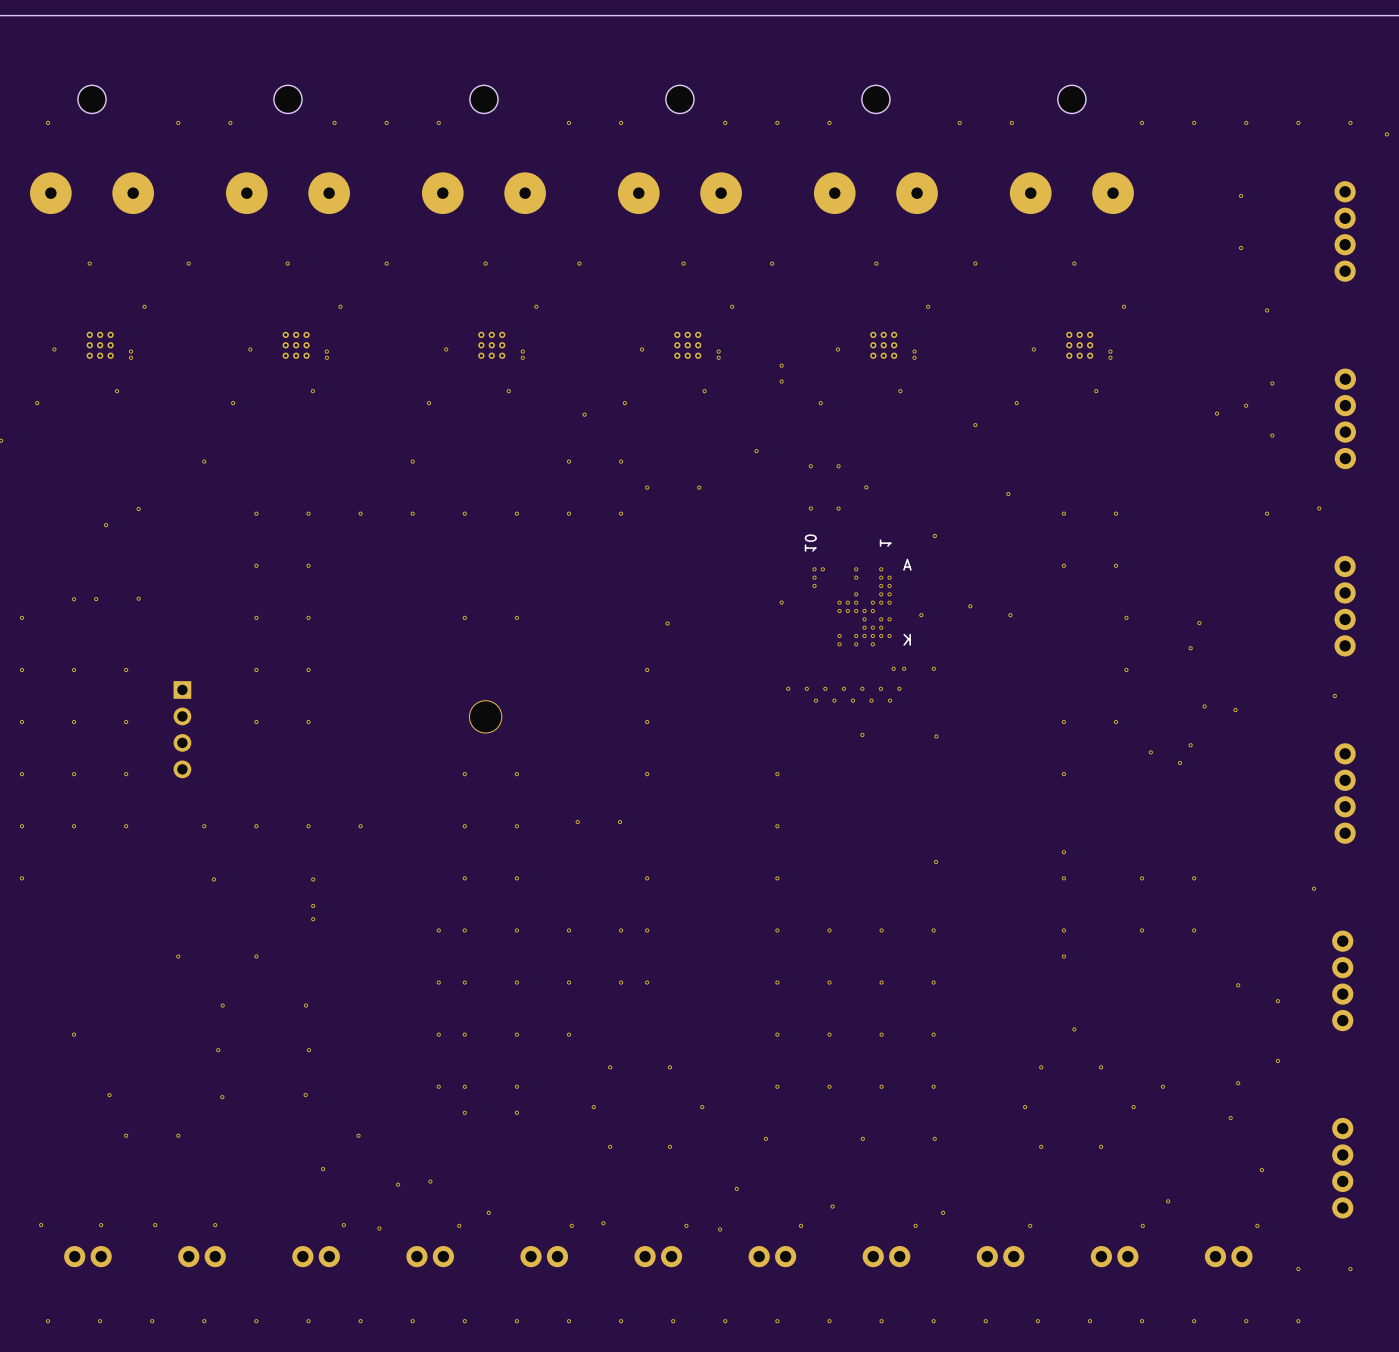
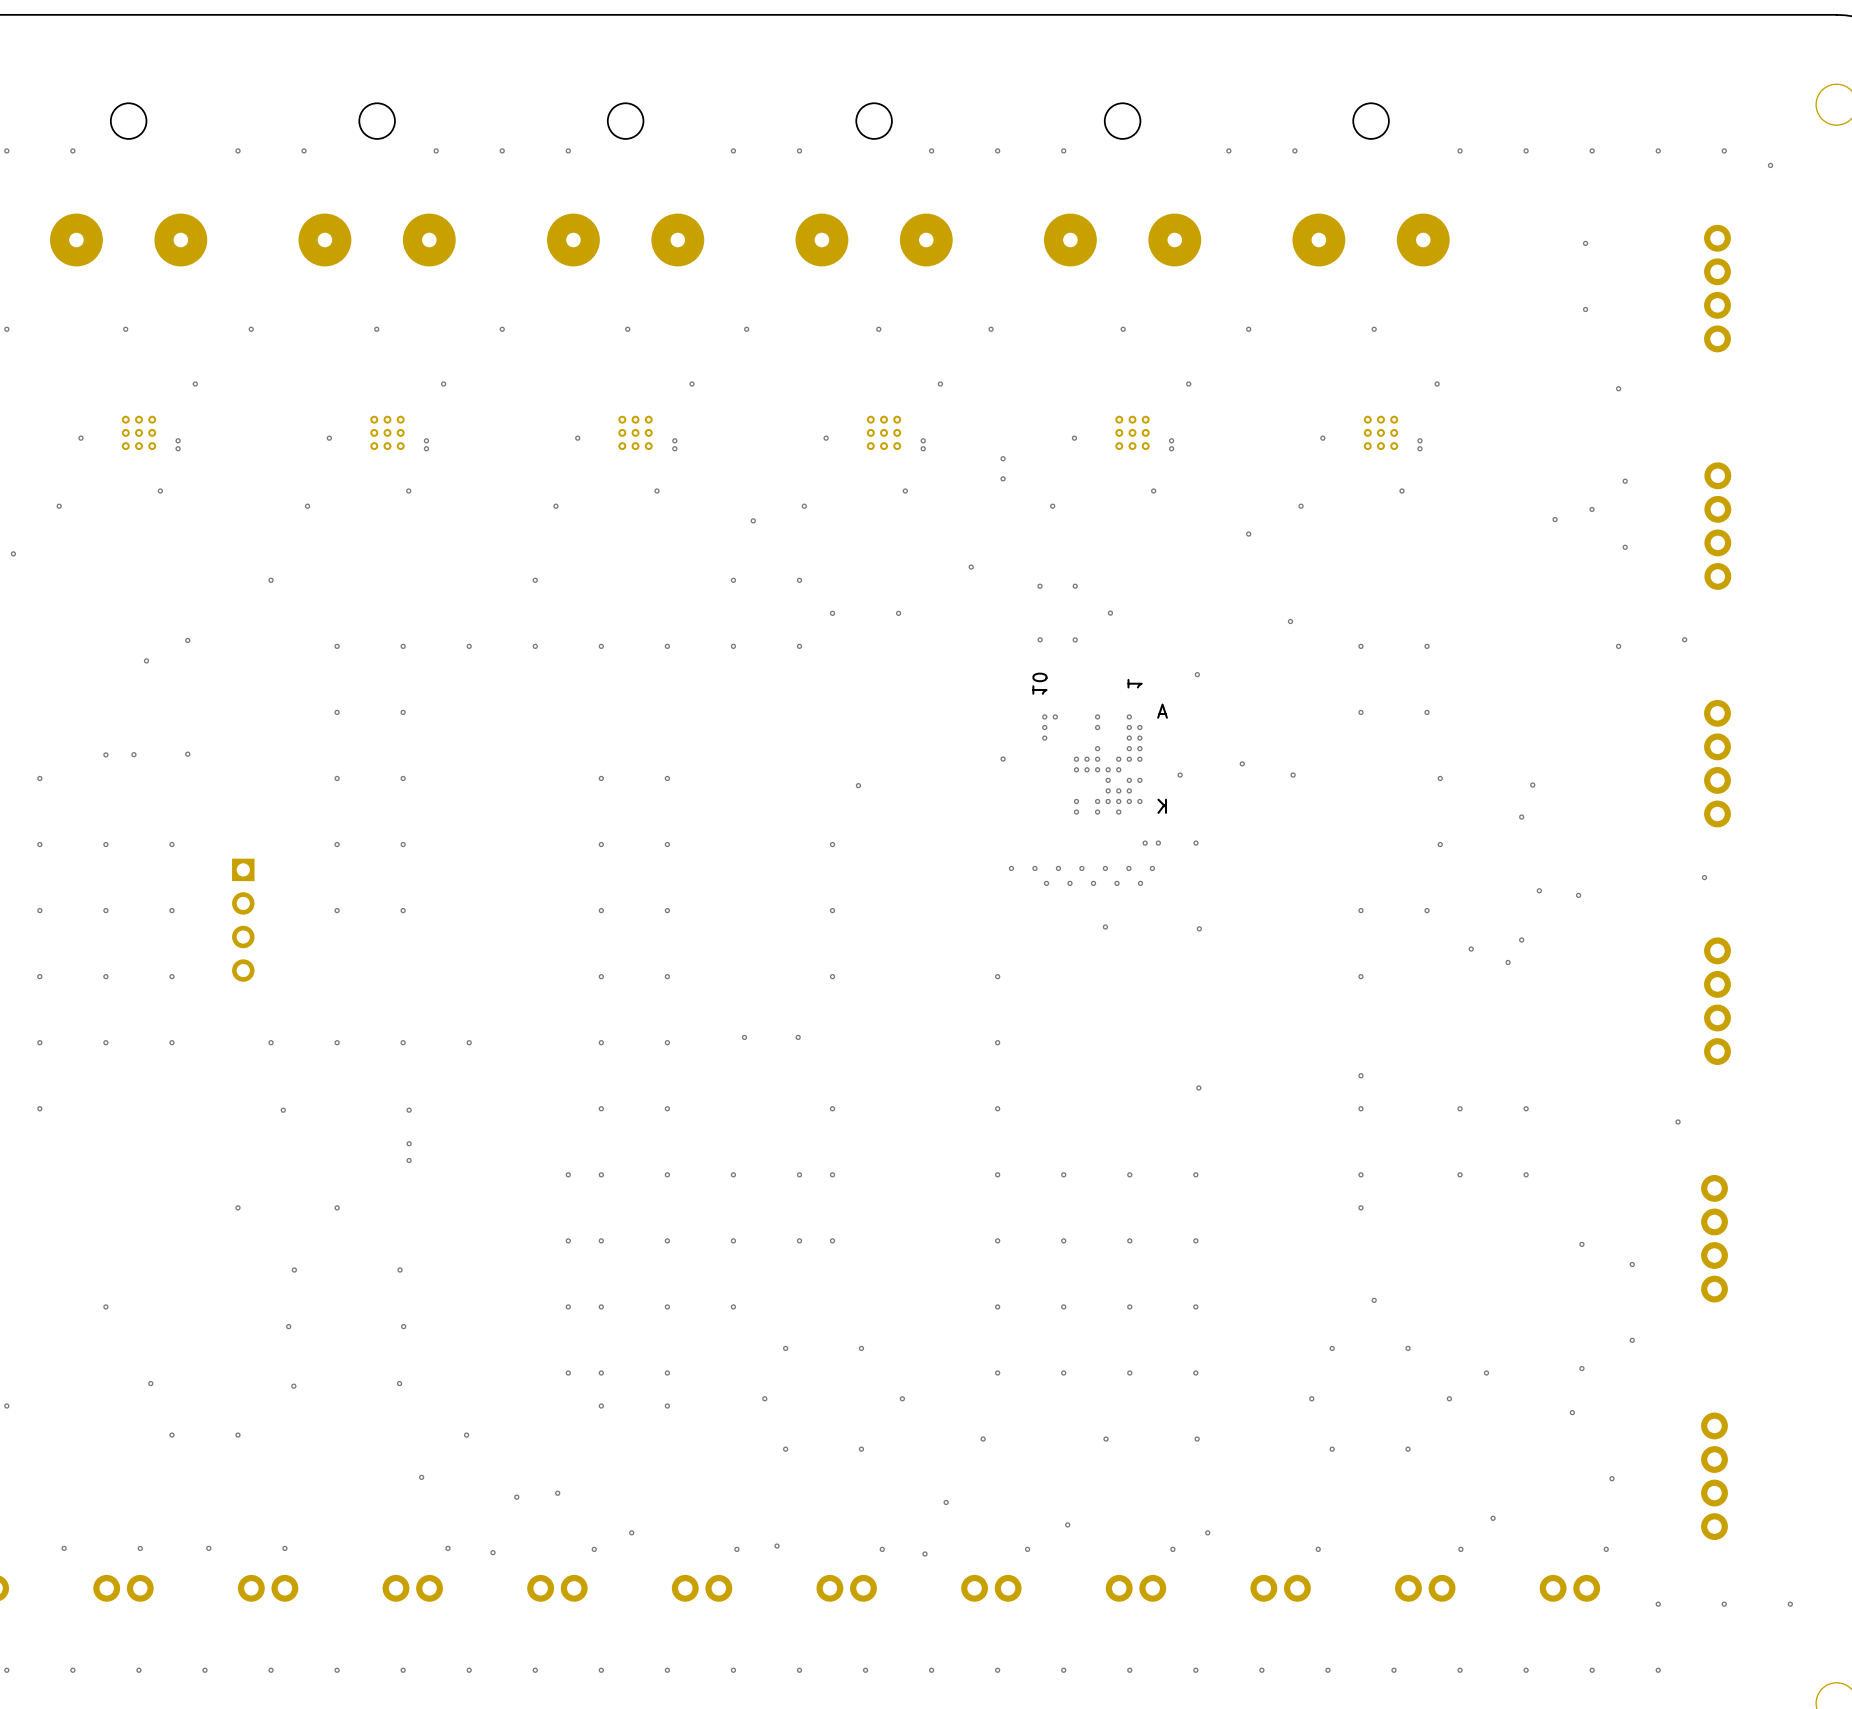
via: none -> (601, 844)
via: none -> (667, 844)
part: (485, 716) -> none
via: none -> (601, 910)
via: none -> (667, 910)

